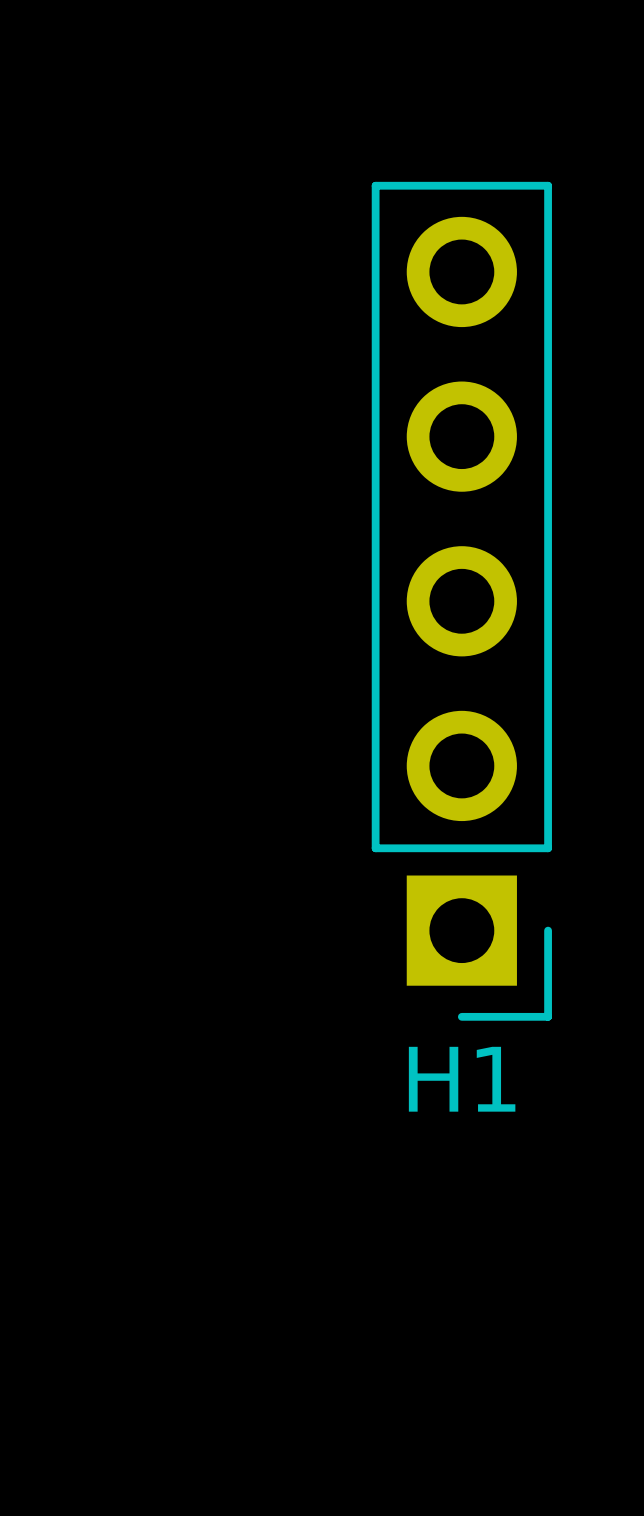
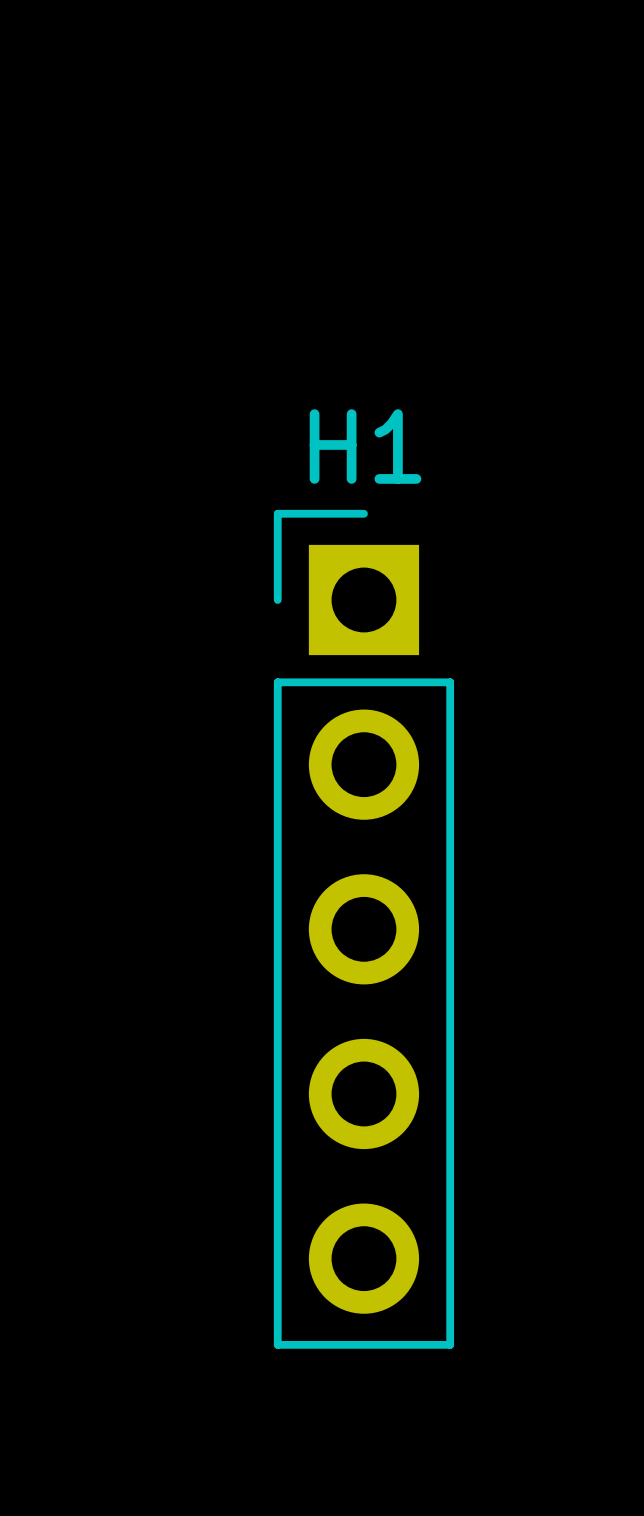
H1 rotation: 0° (461, 601) -> 180° (363, 929)

